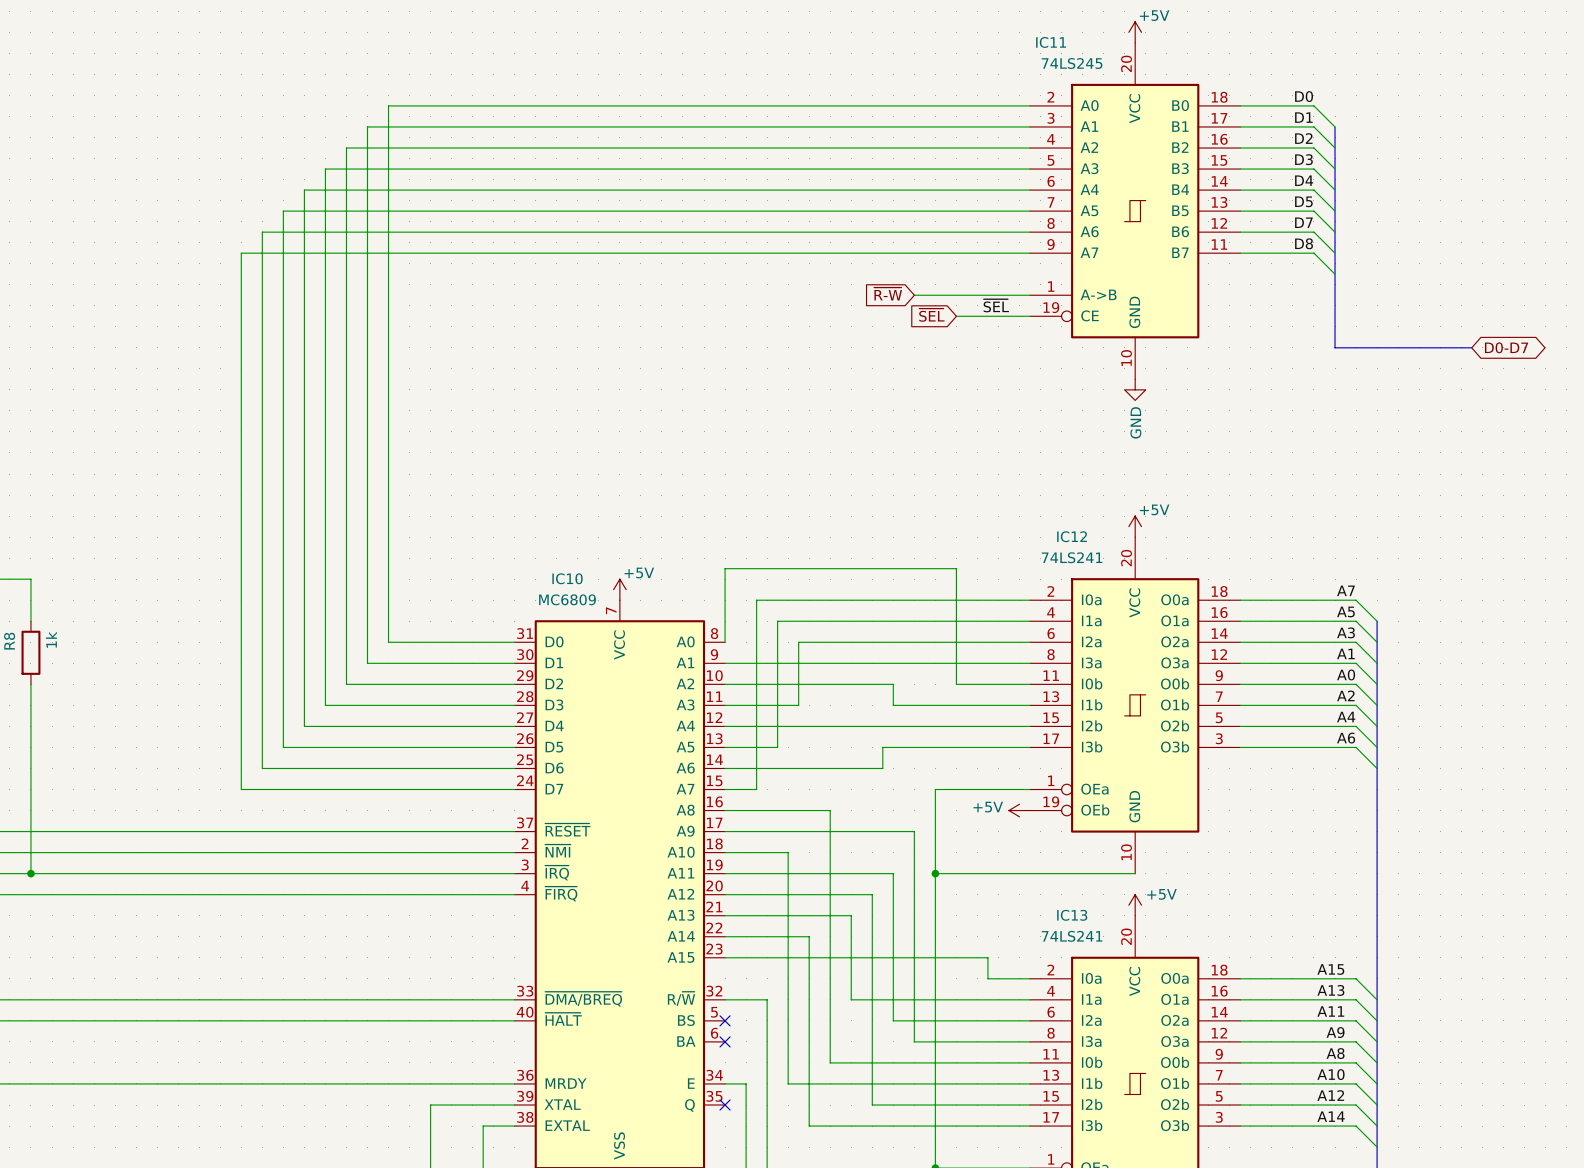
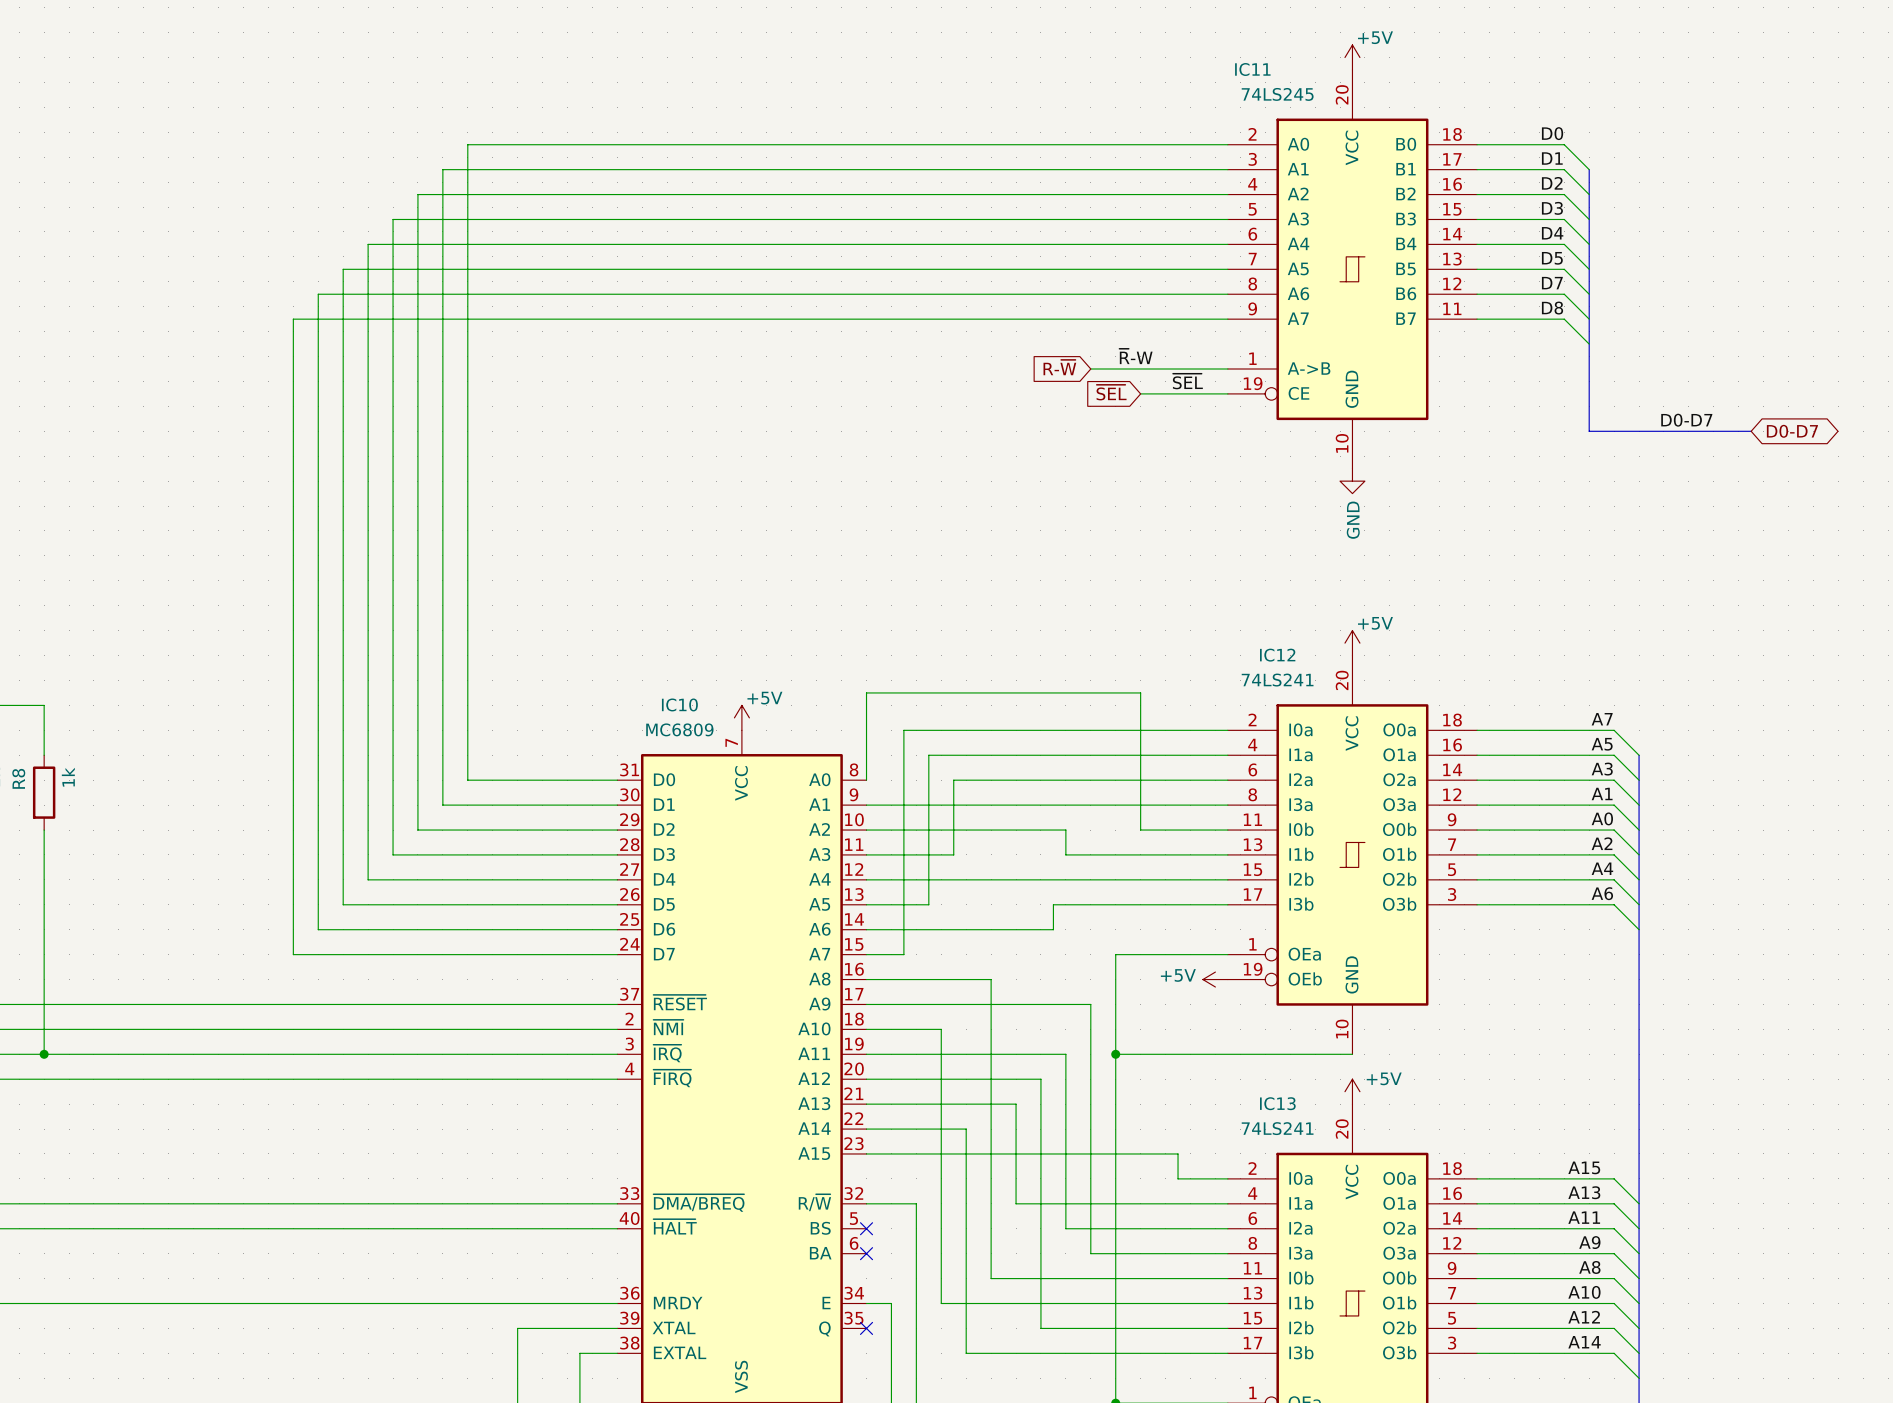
label: none -> ~{R}-W (1135, 356)
global label: ~{R-W} (888, 294) -> R-~{W} (1059, 367)
label: none -> D0-D7 (1686, 420)

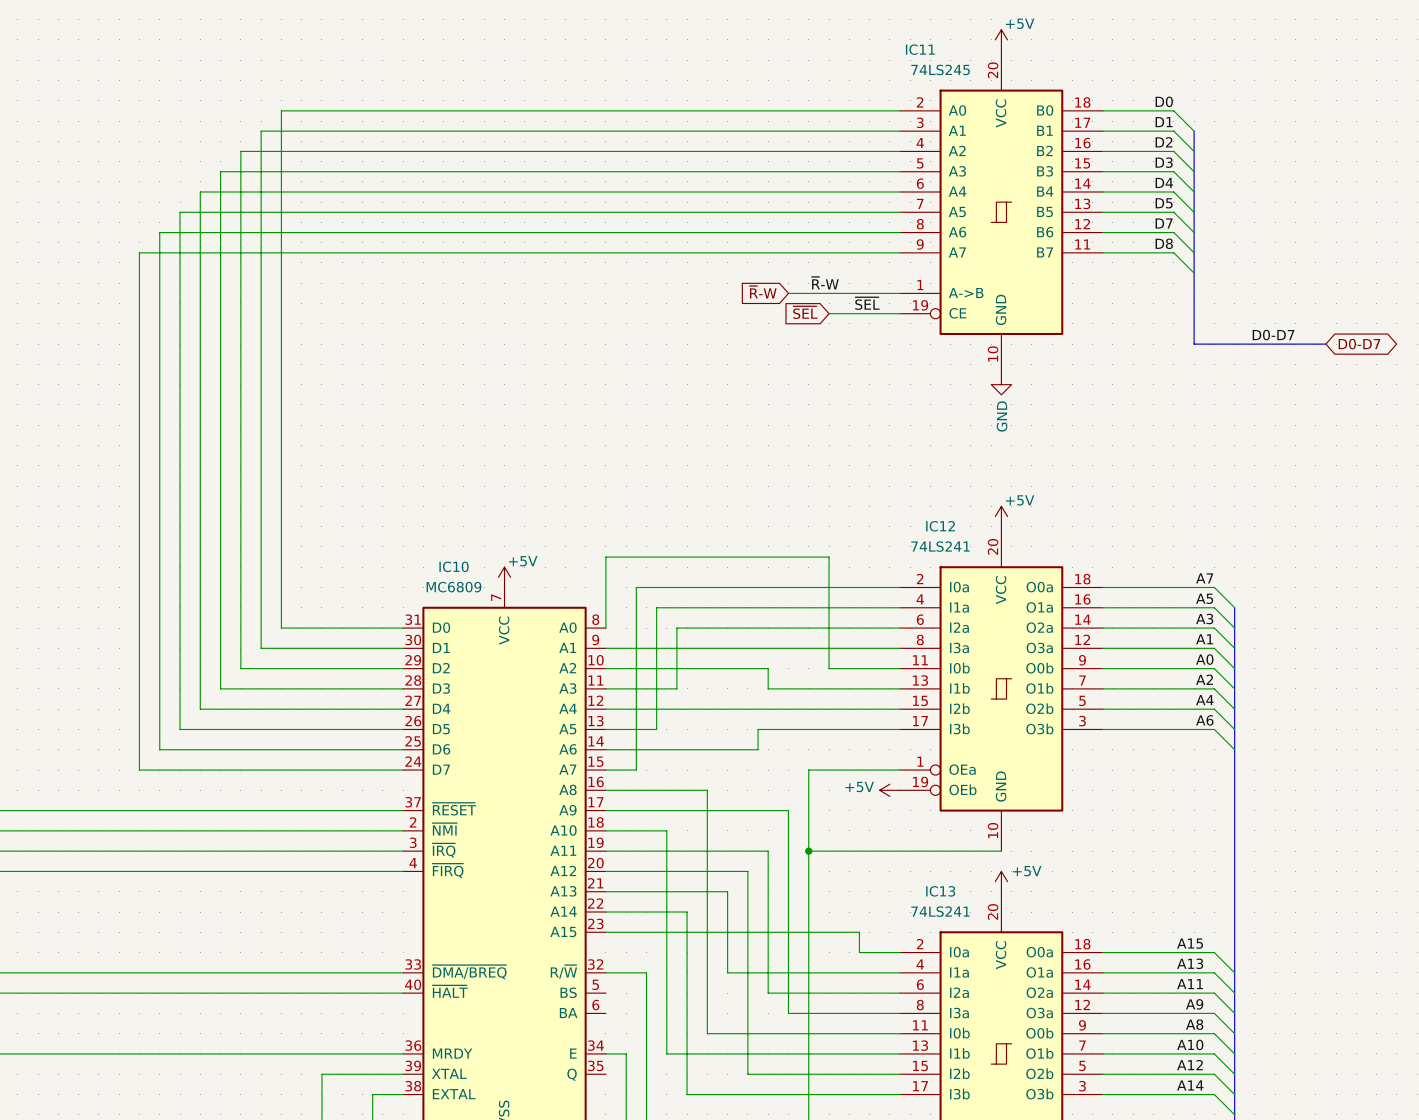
global label: R-~{W} (1059, 367) -> ~{R}-W (763, 292)
no-connect mark: (866, 1228) -> none
no-connect mark: (866, 1253) -> none
no-connect mark: (866, 1328) -> none

